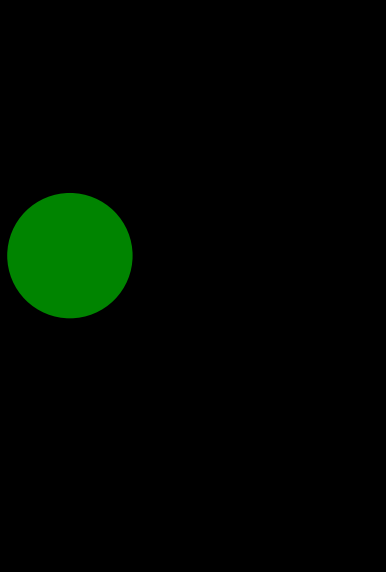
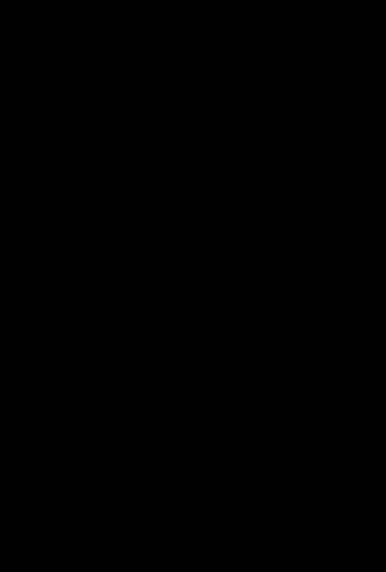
part: (69, 255) -> none

